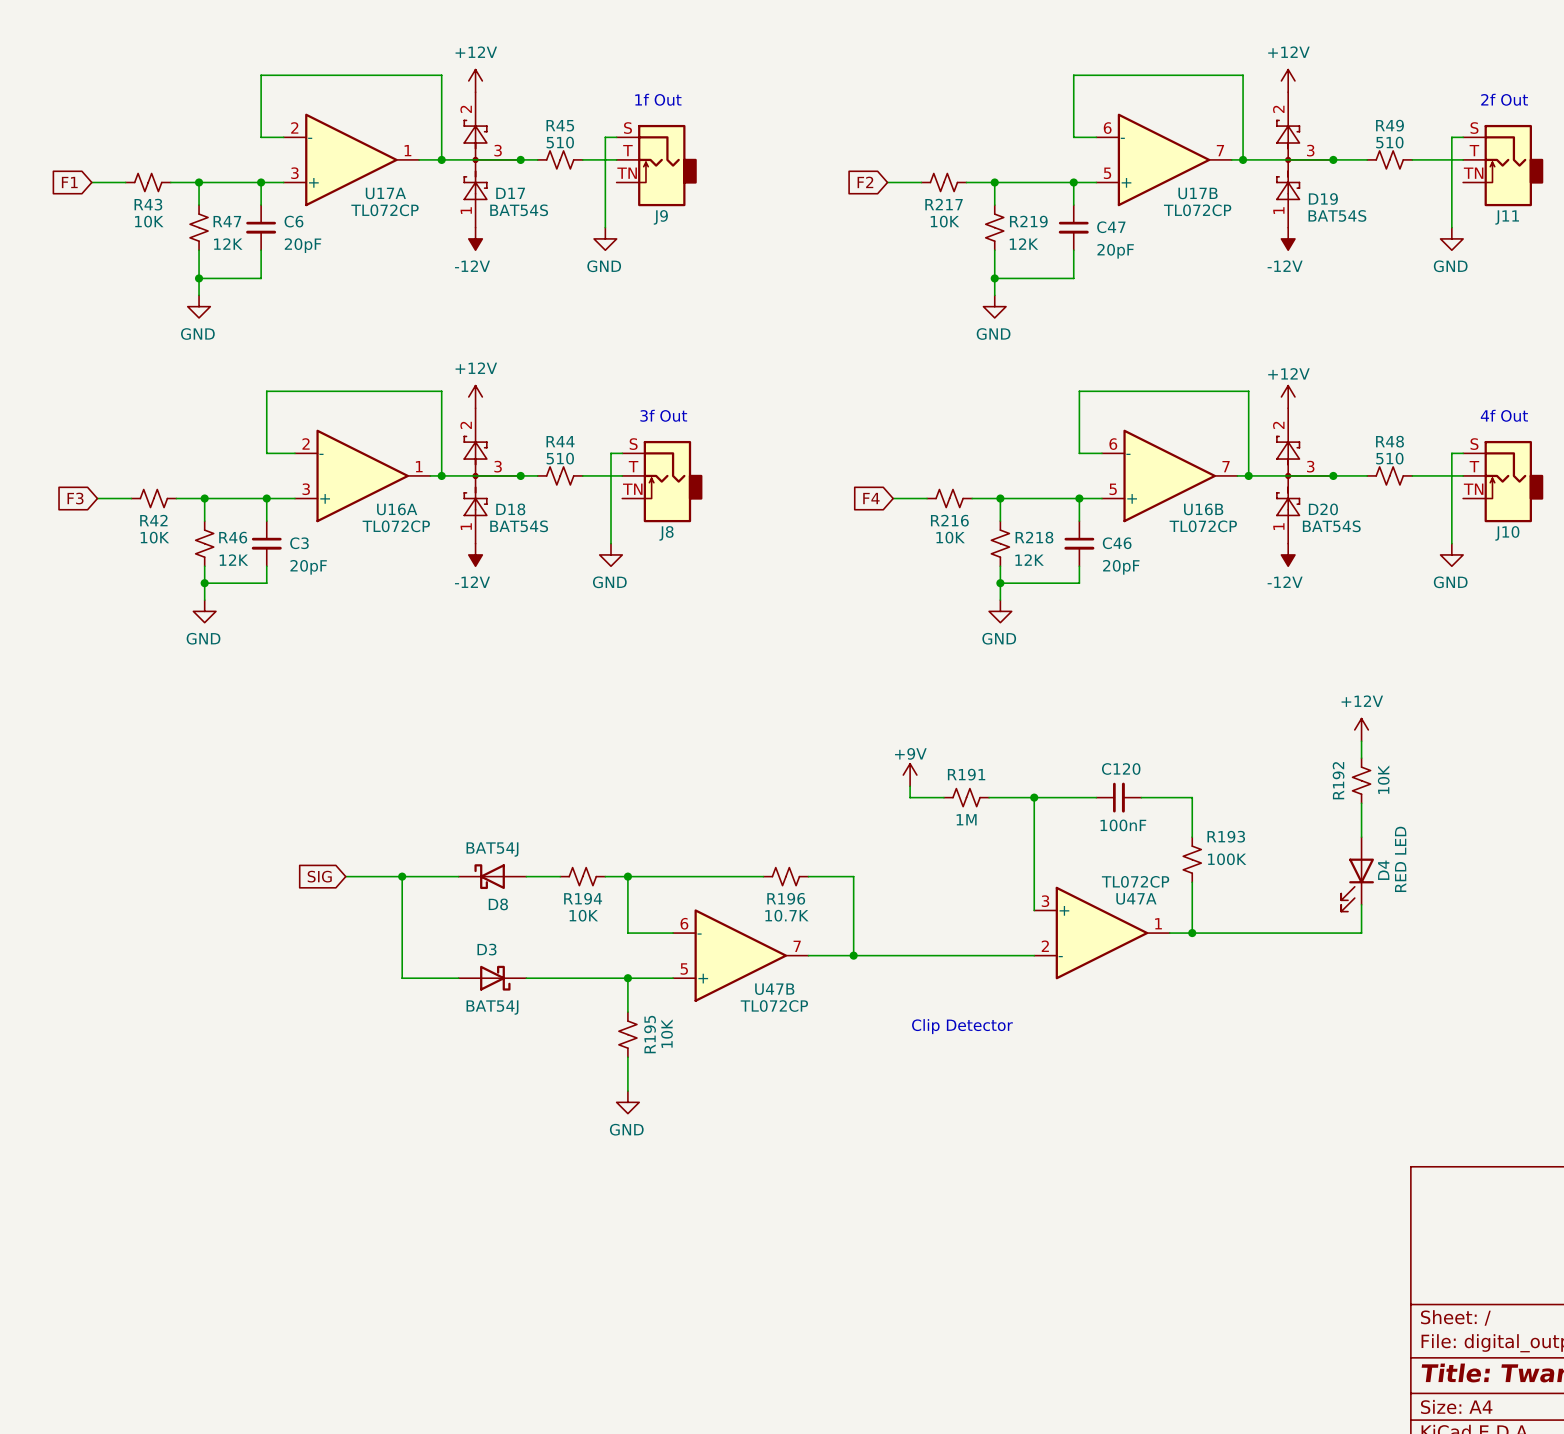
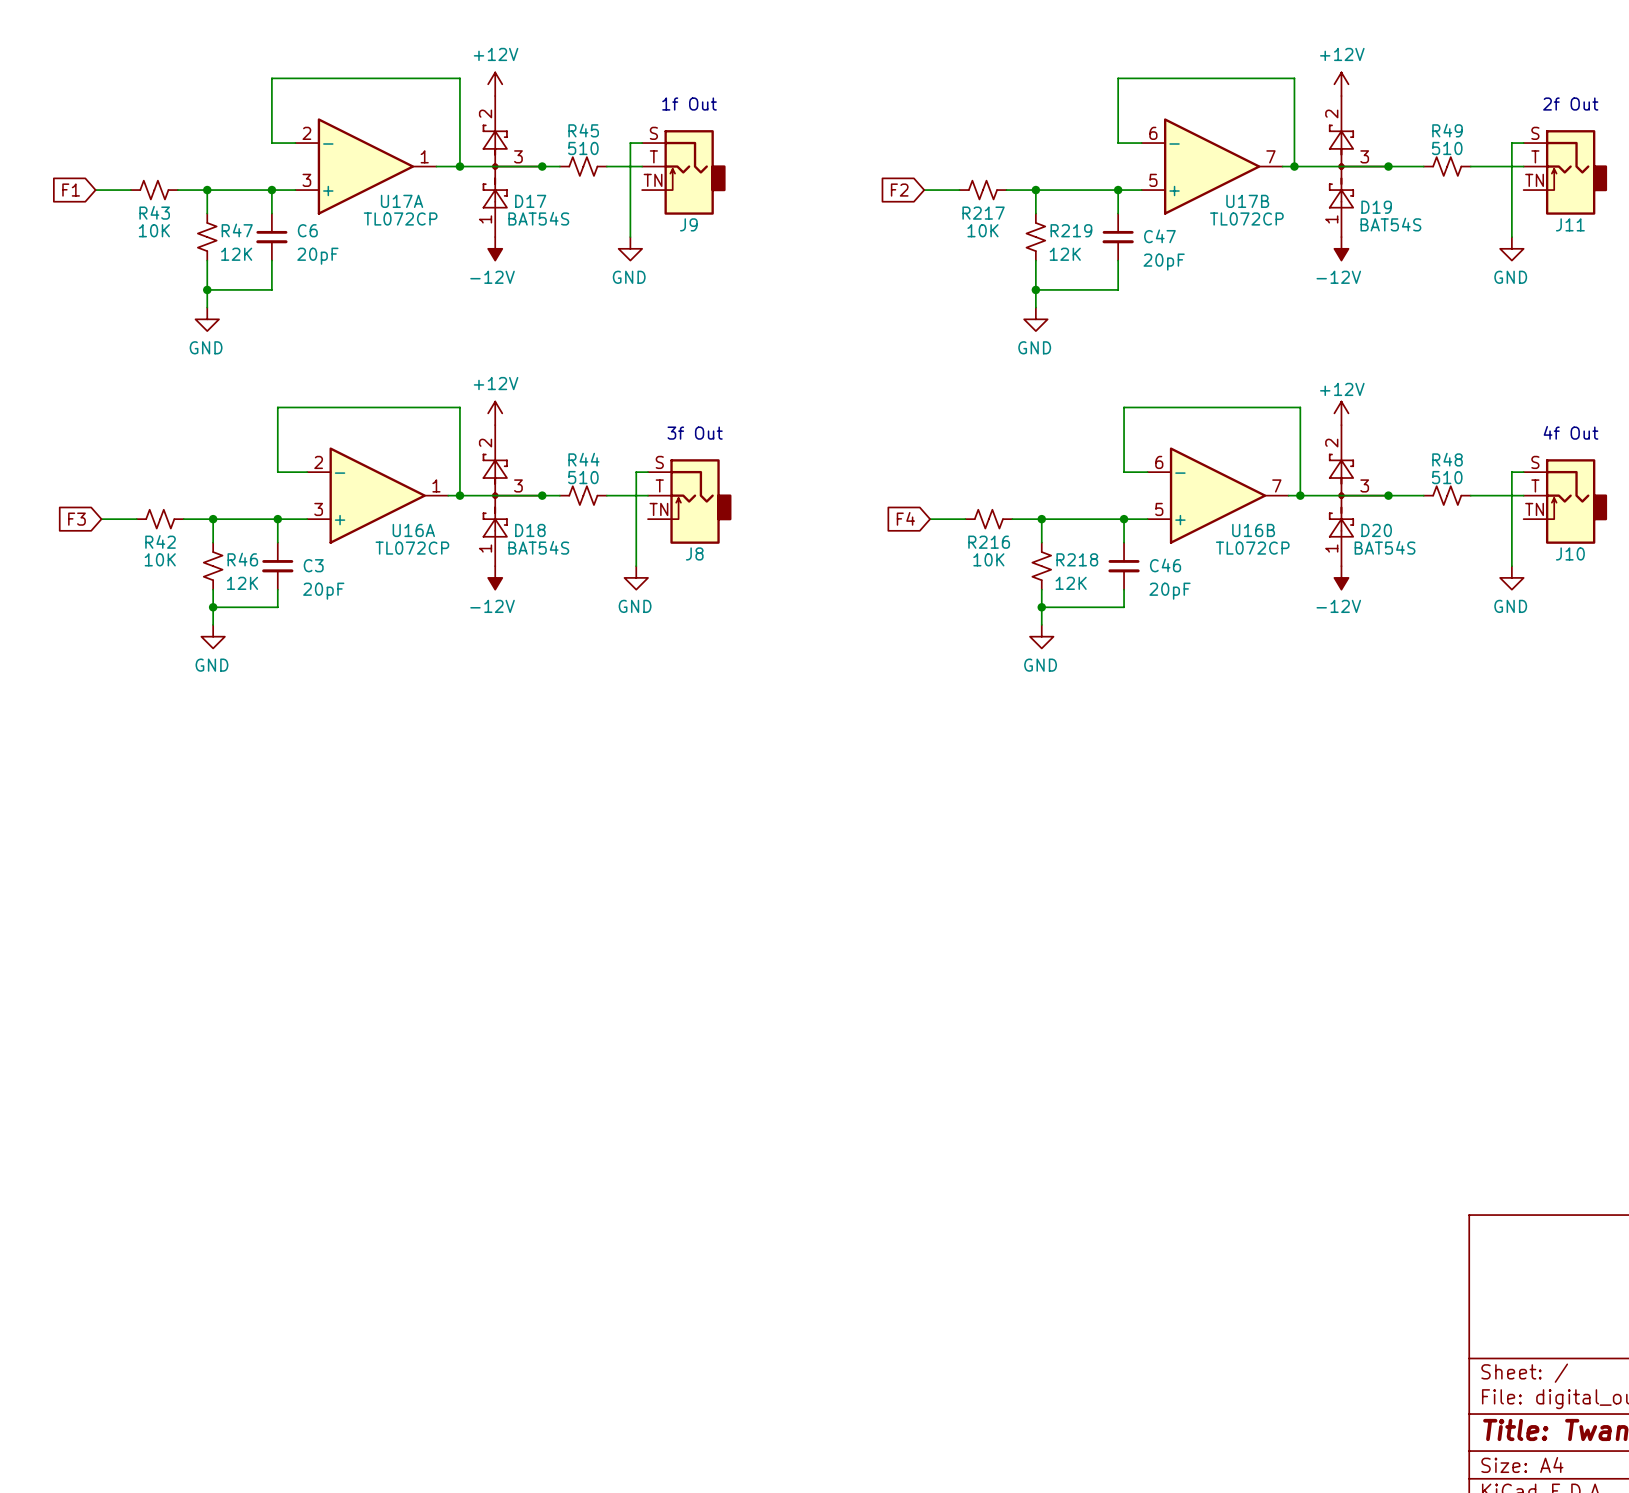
power symbol: +12V (1361, 729) -> none
wire: (1361, 741) (1361, 758) -> none
power symbol: +9V (910, 775) -> none
R192: 10K (1361, 780) -> none
wire: (910, 786) (910, 797) (943, 797) -> none
R191: 1M (966, 797) -> none
wire: (989, 797) (1096, 797) -> none
wire: (1034, 797) (1034, 910) -> none
junction: (1034, 797) -> none
C120: 100nF (1118, 797) -> none
wire: (1141, 797) (1192, 797) (1192, 837) -> none
wire: (1361, 803) (1361, 837) -> none
R193: 100K (1192, 859) -> none
D4: RED LED (1357, 874) -> none
global label: SIG (319, 876) -> none
wire: (345, 876) (458, 876) -> none
wire: (402, 876) (402, 978) (458, 978) -> none
junction: (402, 876) -> none
D8: BAT54J (492, 876) -> none
wire: (526, 876) (560, 876) -> none
R194: 10K (582, 876) -> none
wire: (605, 876) (763, 876) -> none
wire: (627, 876) (627, 933) (673, 933) -> none
junction: (627, 876) -> none
R196: 10.7K (785, 876) -> none
wire: (808, 876) (853, 876) (853, 955) -> none
wire: (1192, 882) (1192, 933) -> none
wire: (1361, 904) (1361, 933) (1169, 933) -> none
U47A: TL072CP (1101, 933) -> none
junction: (1192, 933) -> none
U47B: TL072CP (740, 955) -> none
wire: (808, 955) (1034, 955) -> none
junction: (853, 955) -> none
D3: BAT54J (492, 978) -> none
wire: (526, 978) (673, 978) -> none
wire: (627, 978) (627, 1012) -> none
junction: (627, 978) -> none
text: Clip Detector (962, 1026) -> none
R195: 10K (627, 1034) -> none
wire: (627, 1057) (627, 1091) -> none
power symbol: GND (627, 1102) -> none

